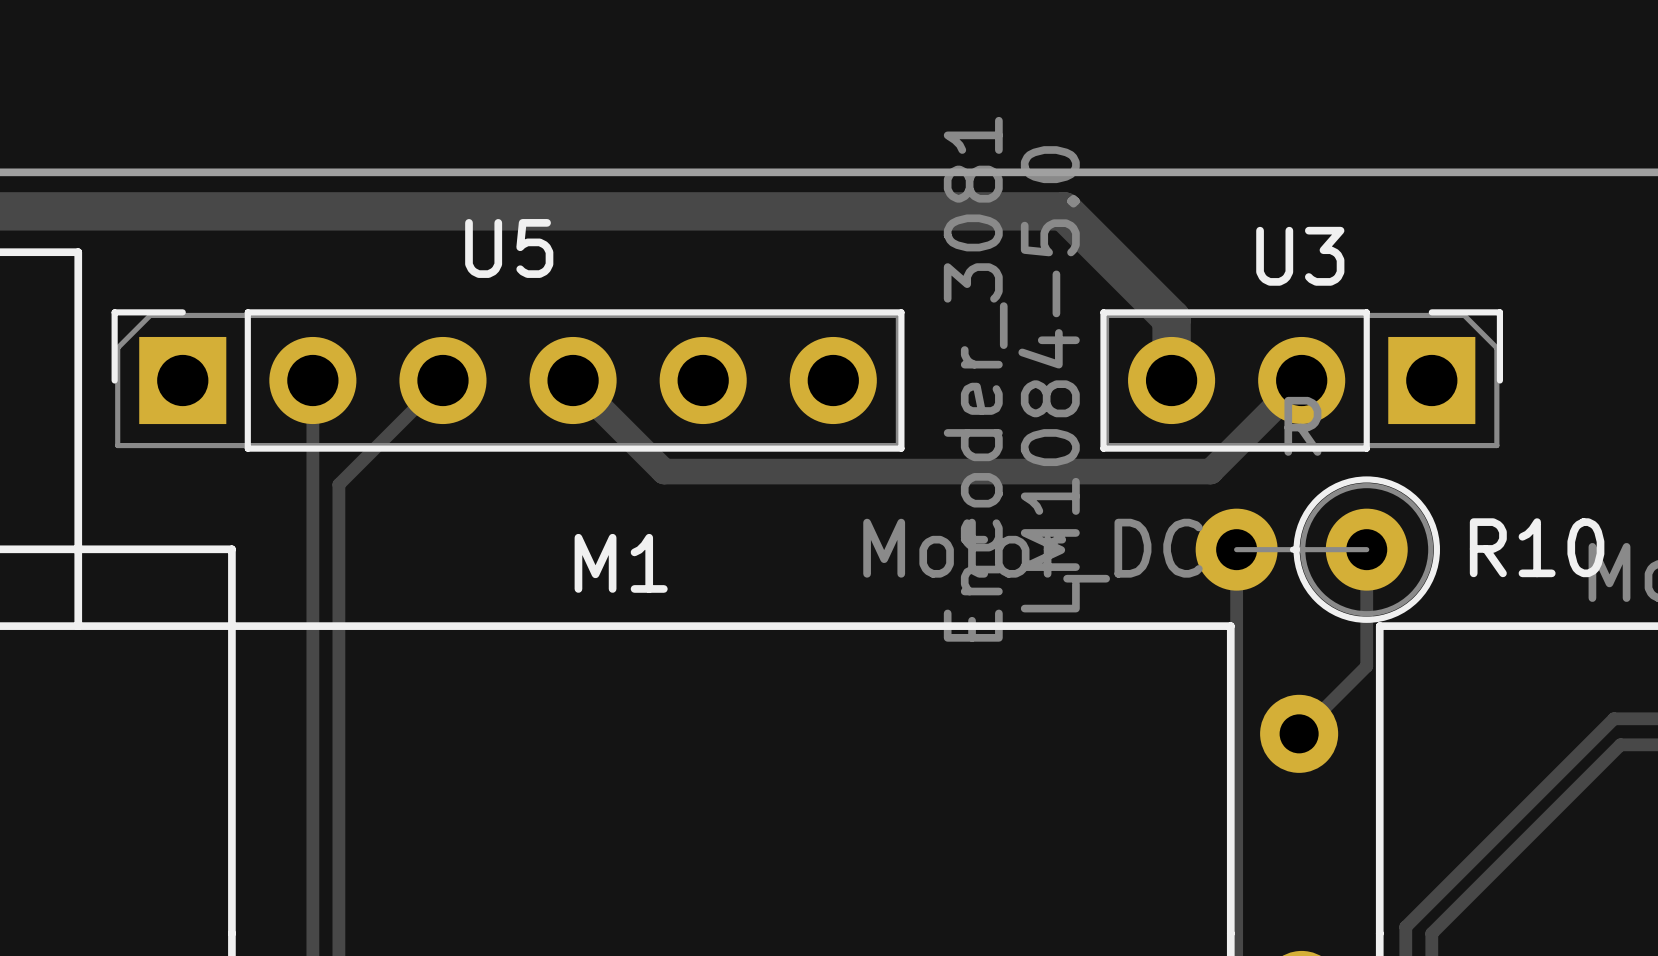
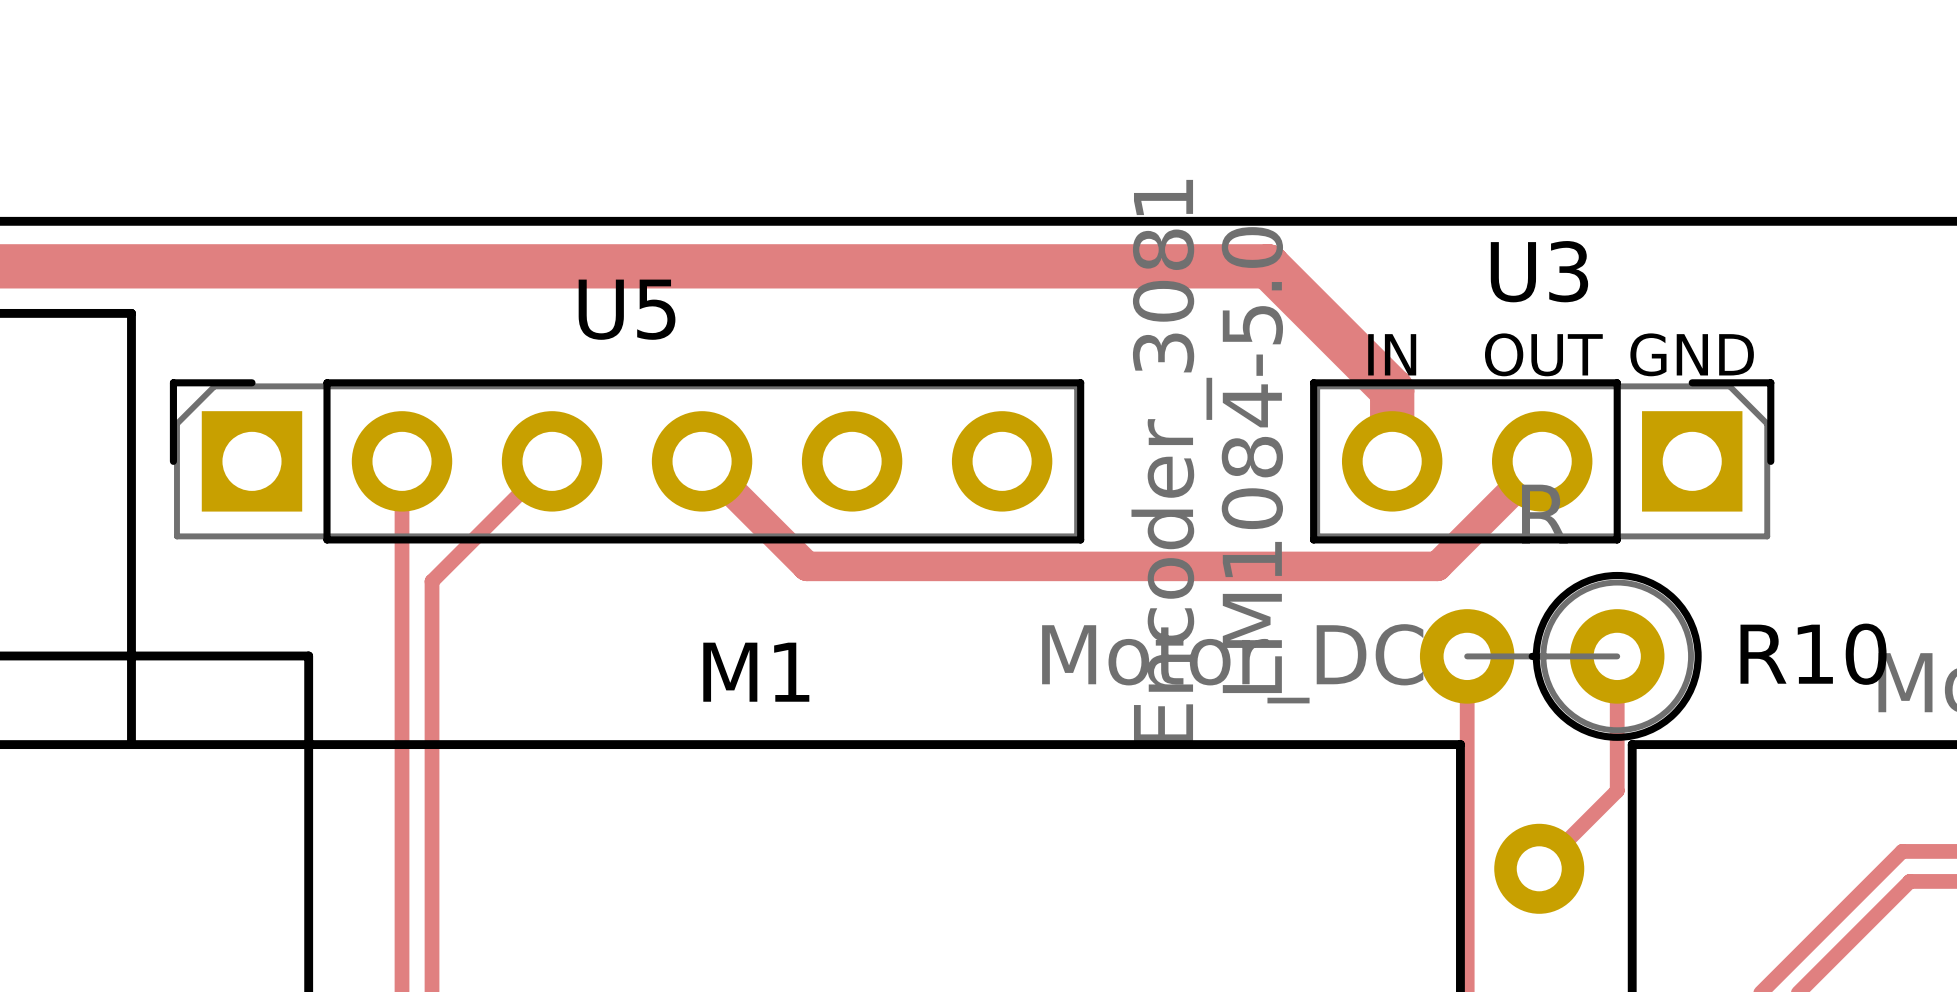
U3 name position: U3 (1300, 256) -> U3 (1539, 271)
text: none -> IN (1392, 354)
text: none -> OUT (1543, 354)
text: none -> GND (1692, 354)

